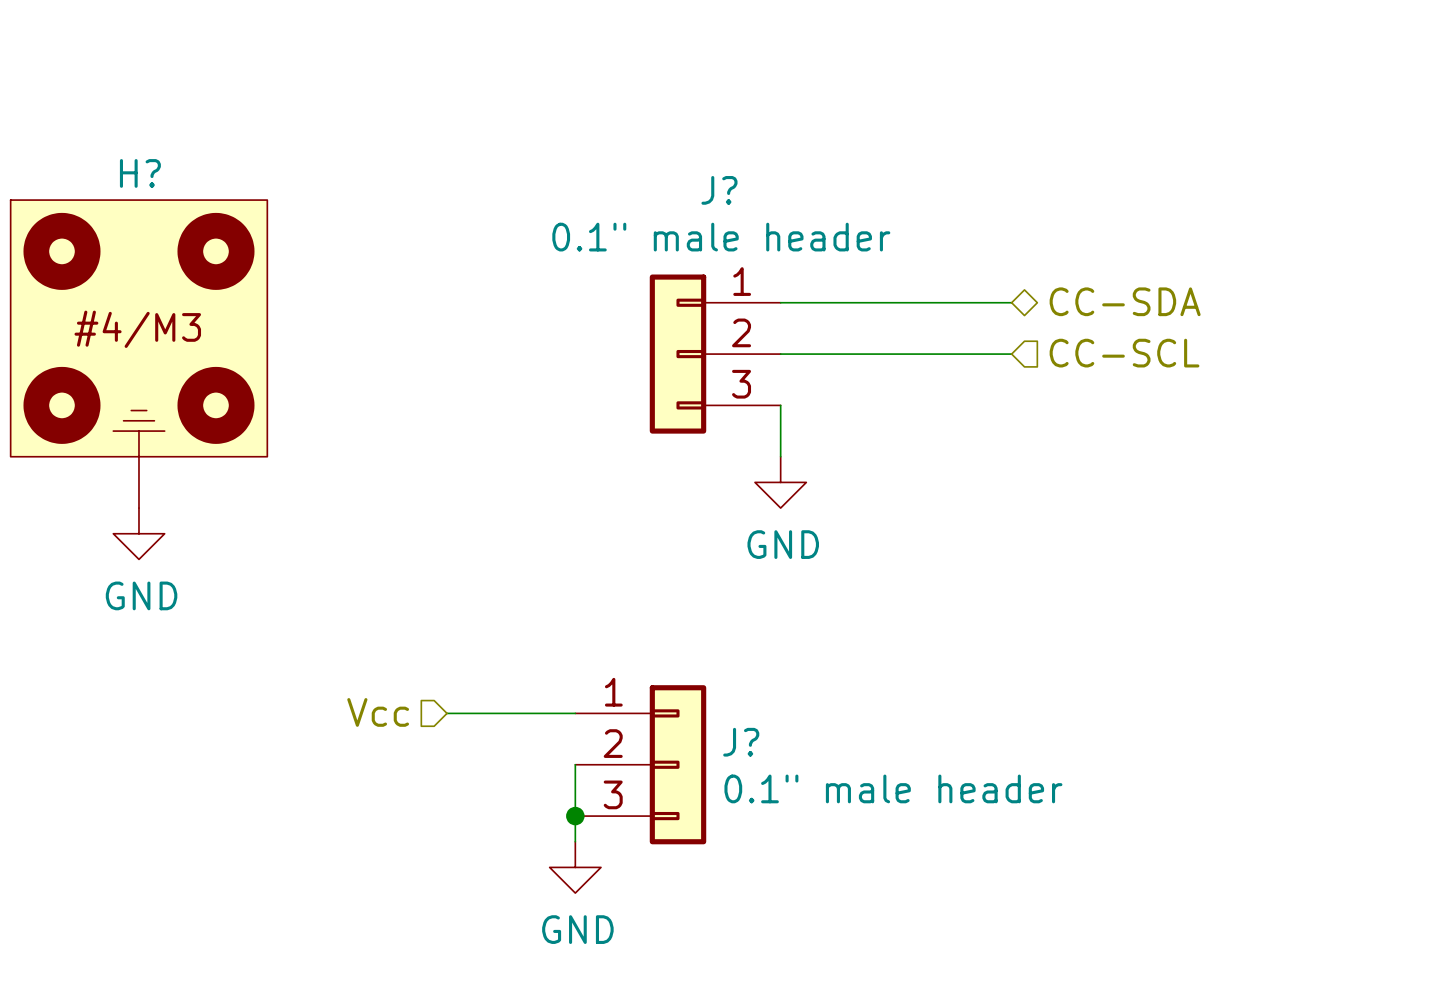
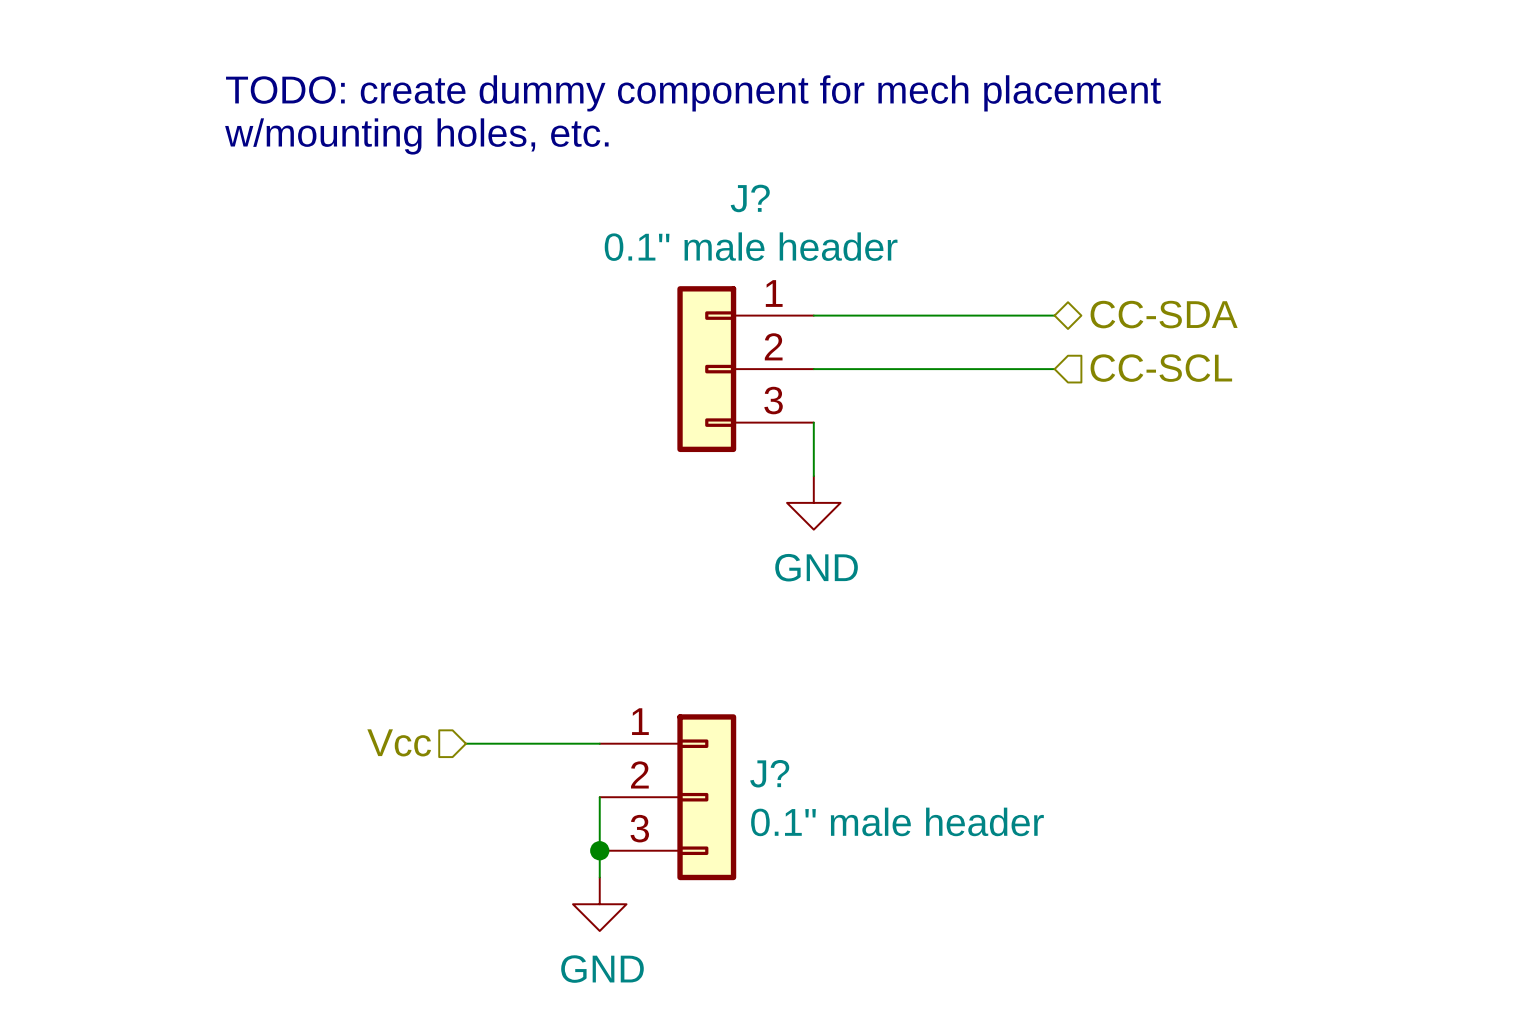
text: none -> TODO: create dummy component for mech placement (693, 93)
text: none -> w/mounting holes, etc. (416, 136)
H?: (138, 354) -> none
power symbol: GND (138, 533) -> none

